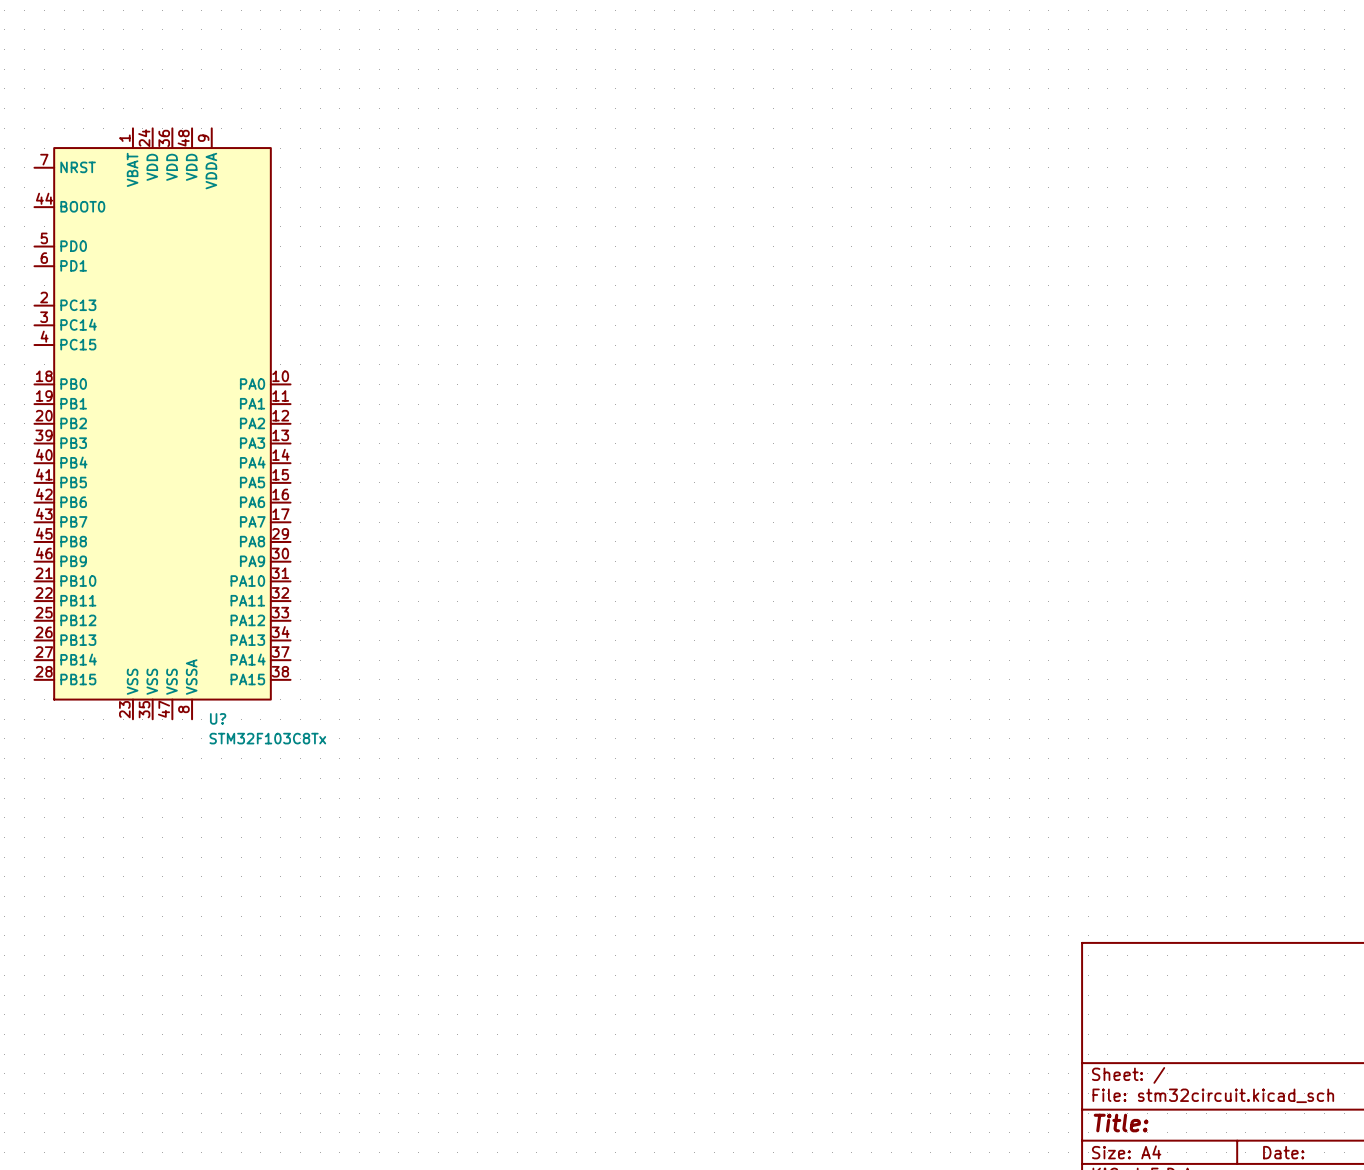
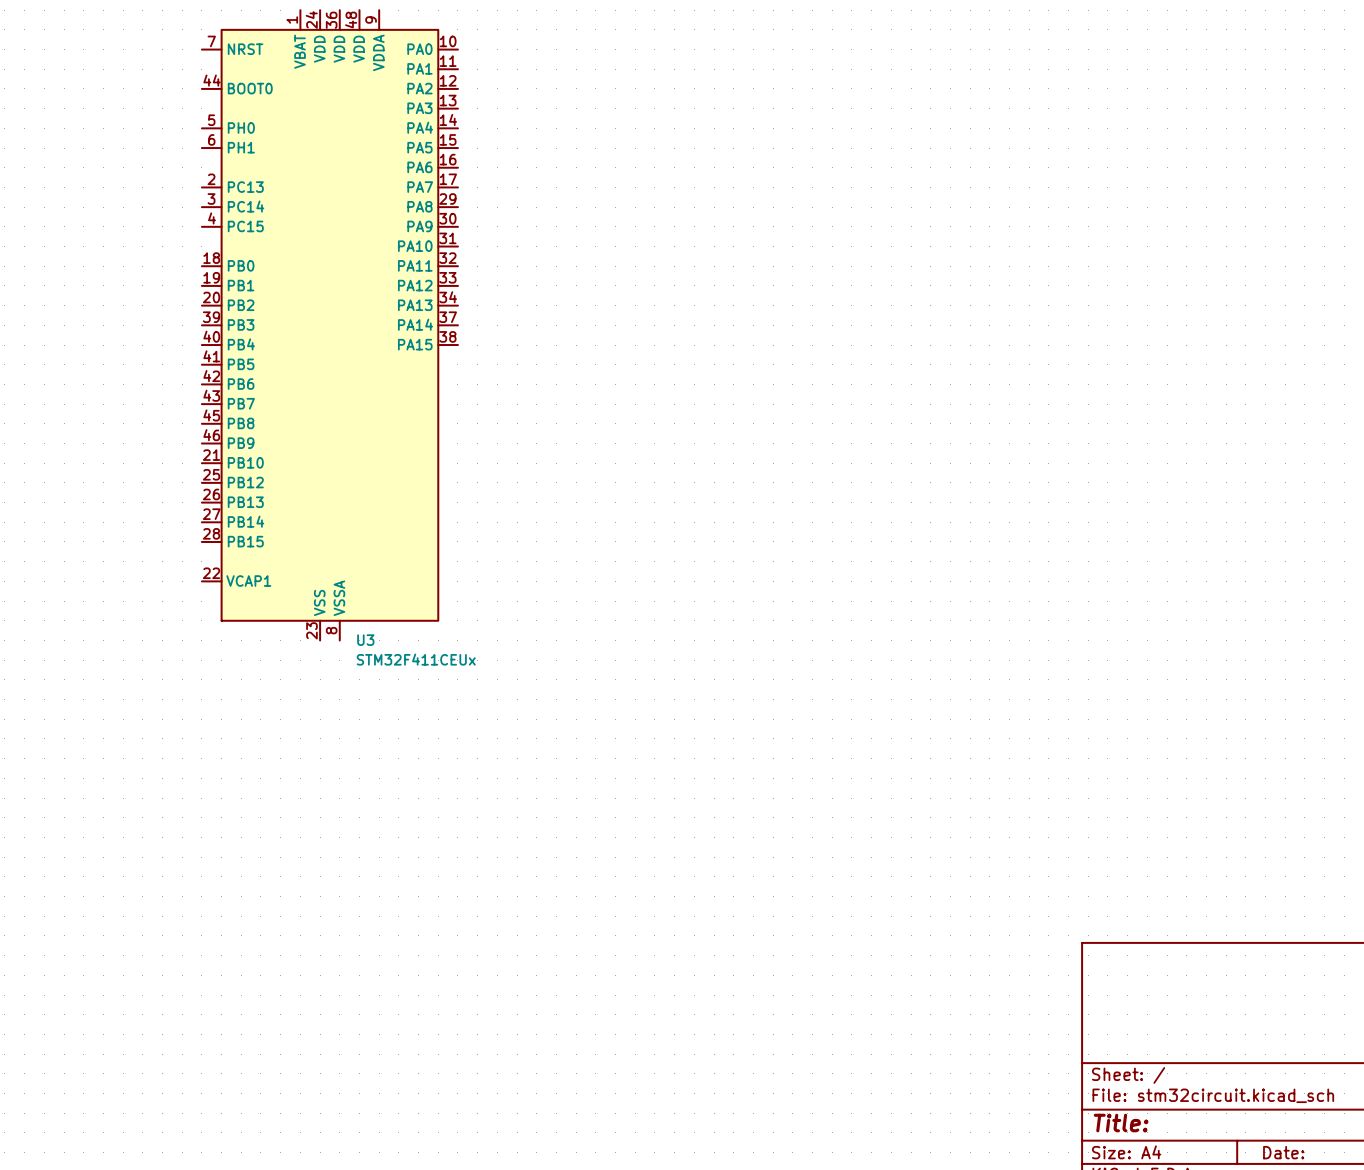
U3: none -> STM32F411CEUx (329, 325)
U?: STM32F103C8Tx (162, 423) -> none

